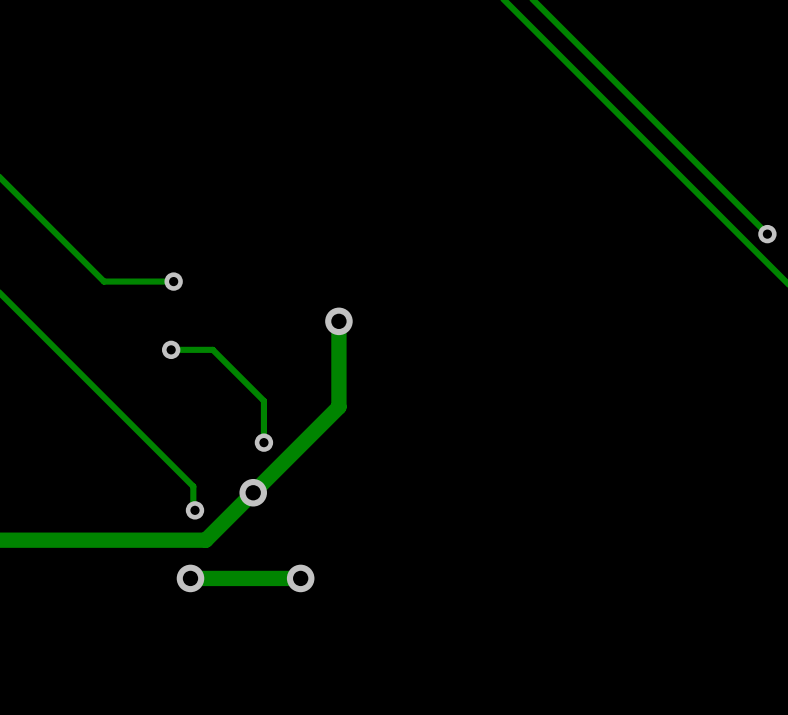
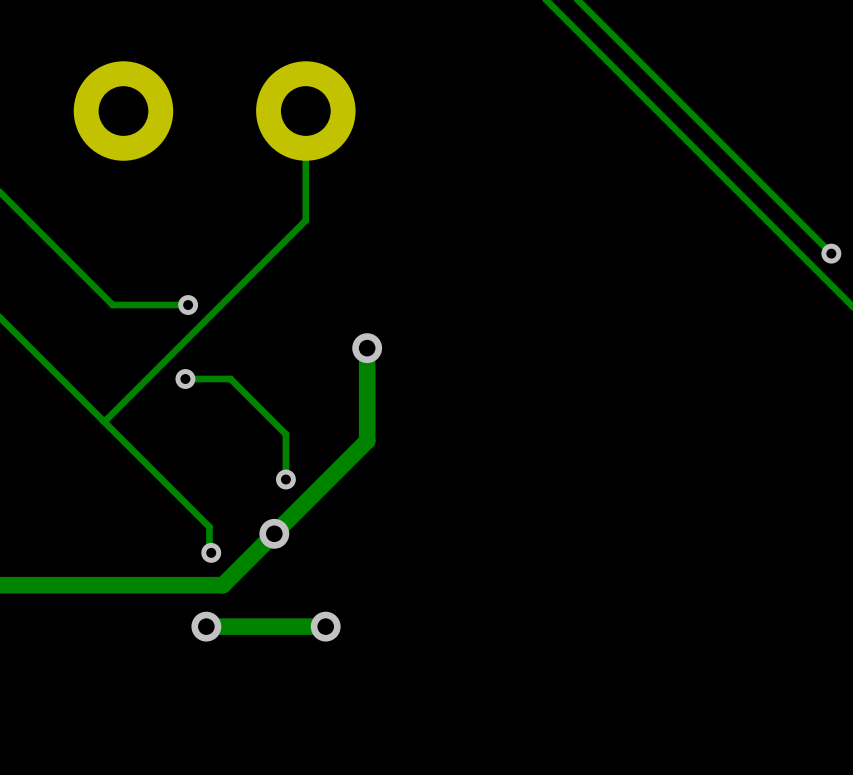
part: none -> (123, 111)
track: none -> (305, 111) (305, 220) (106, 420) (102, 420)
part: none -> (305, 111)

